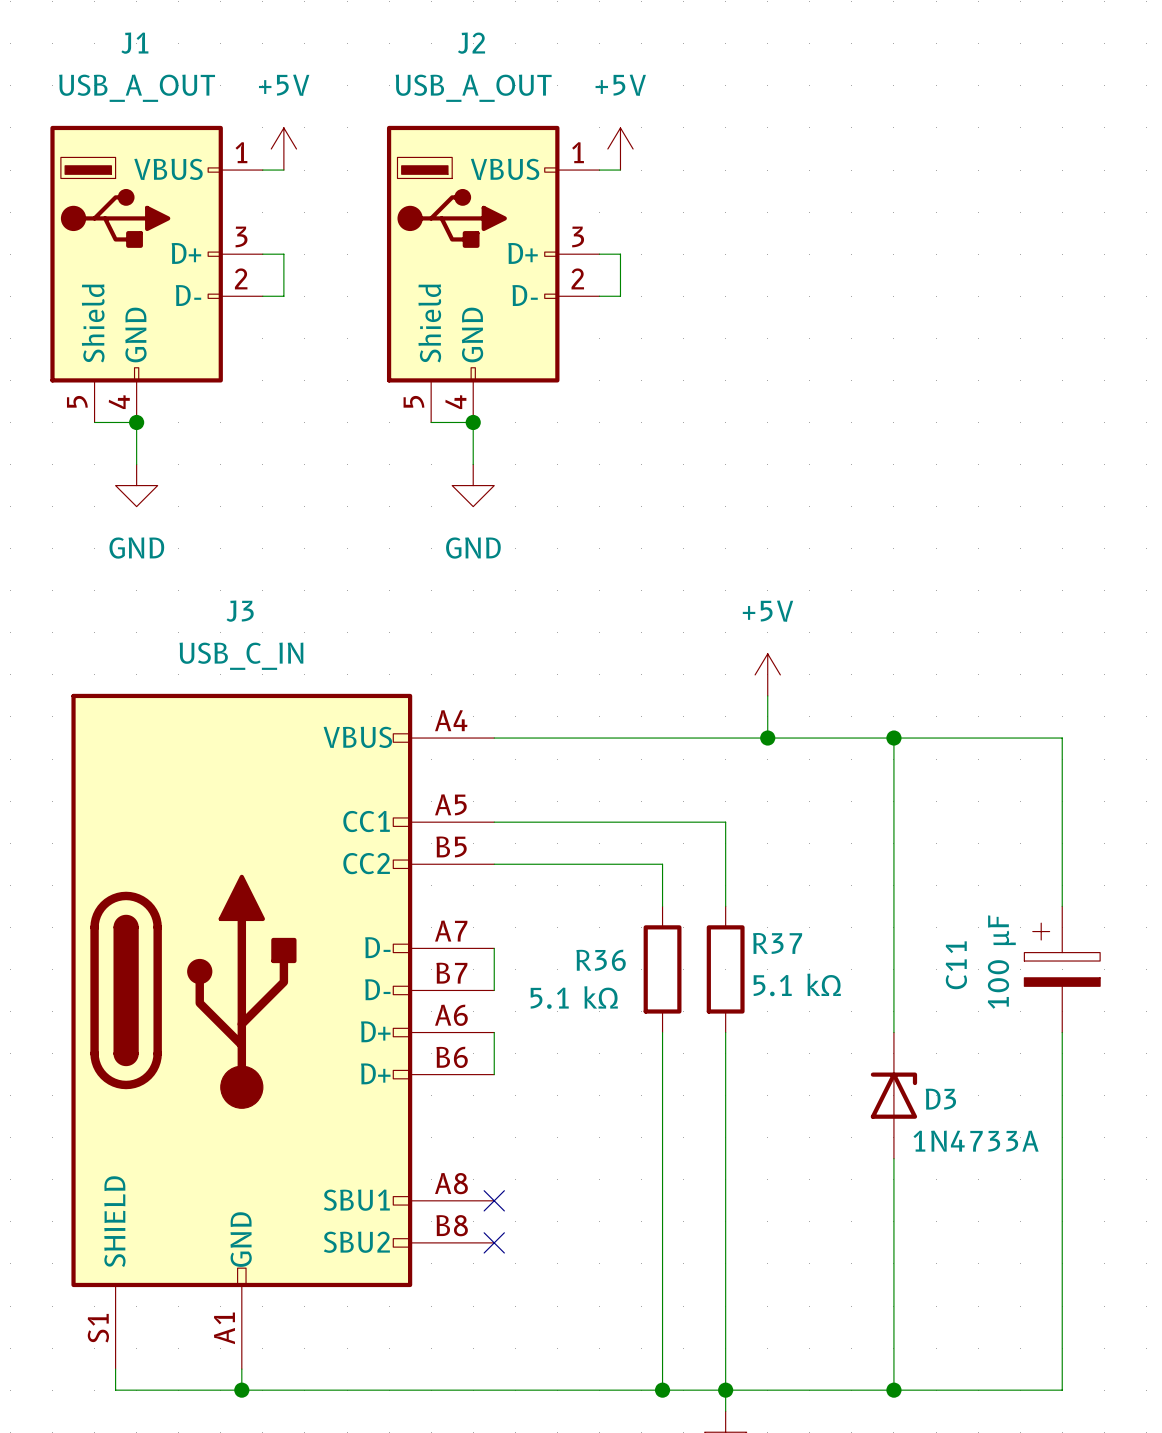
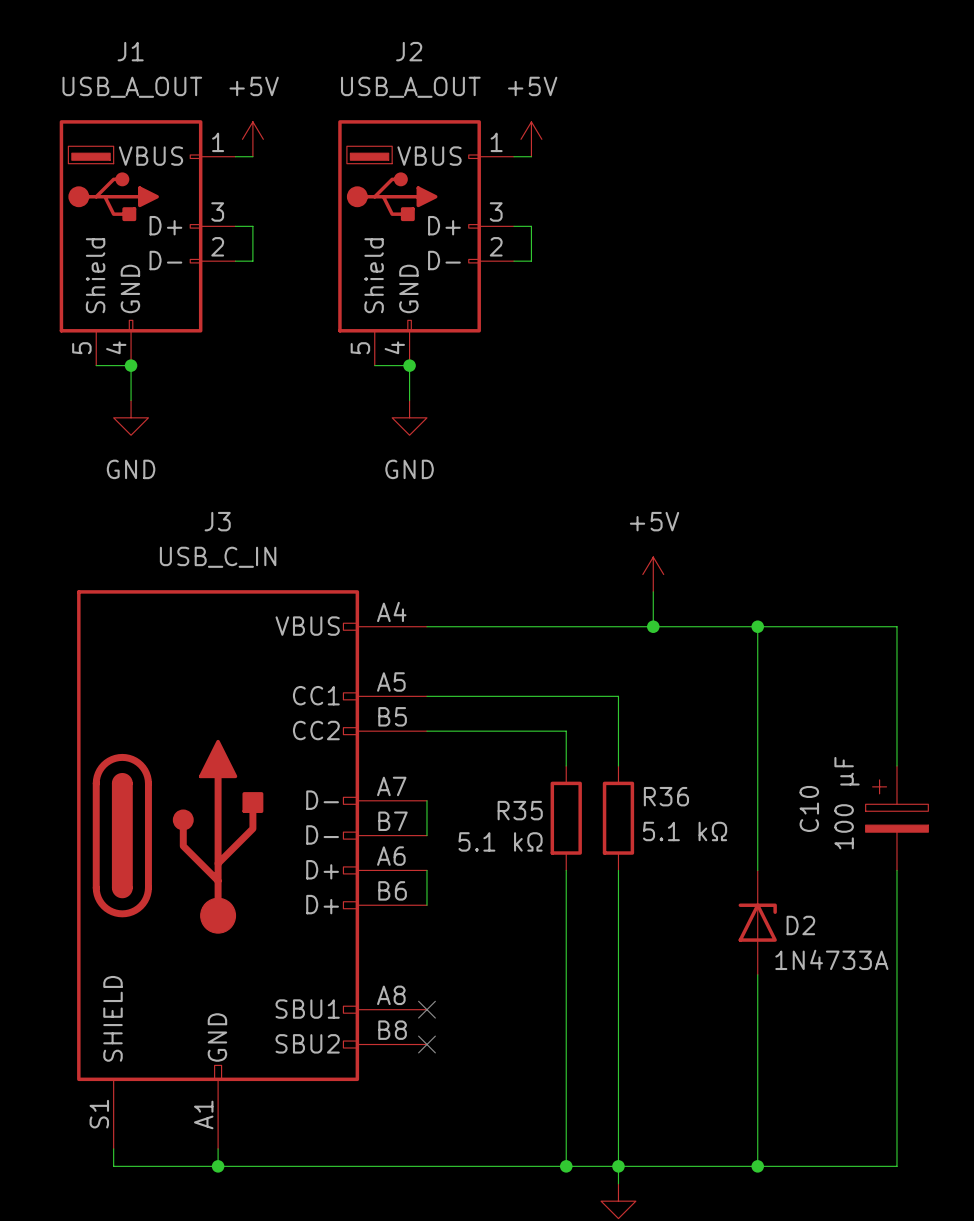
R37 name: R37 (777, 943) -> R36 (666, 796)
R36 name: R36 (601, 960) -> R35 (520, 810)
C11 name: C11 (956, 965) -> C10 (809, 808)
D3 name: D3 (940, 1099) -> D2 (800, 925)

